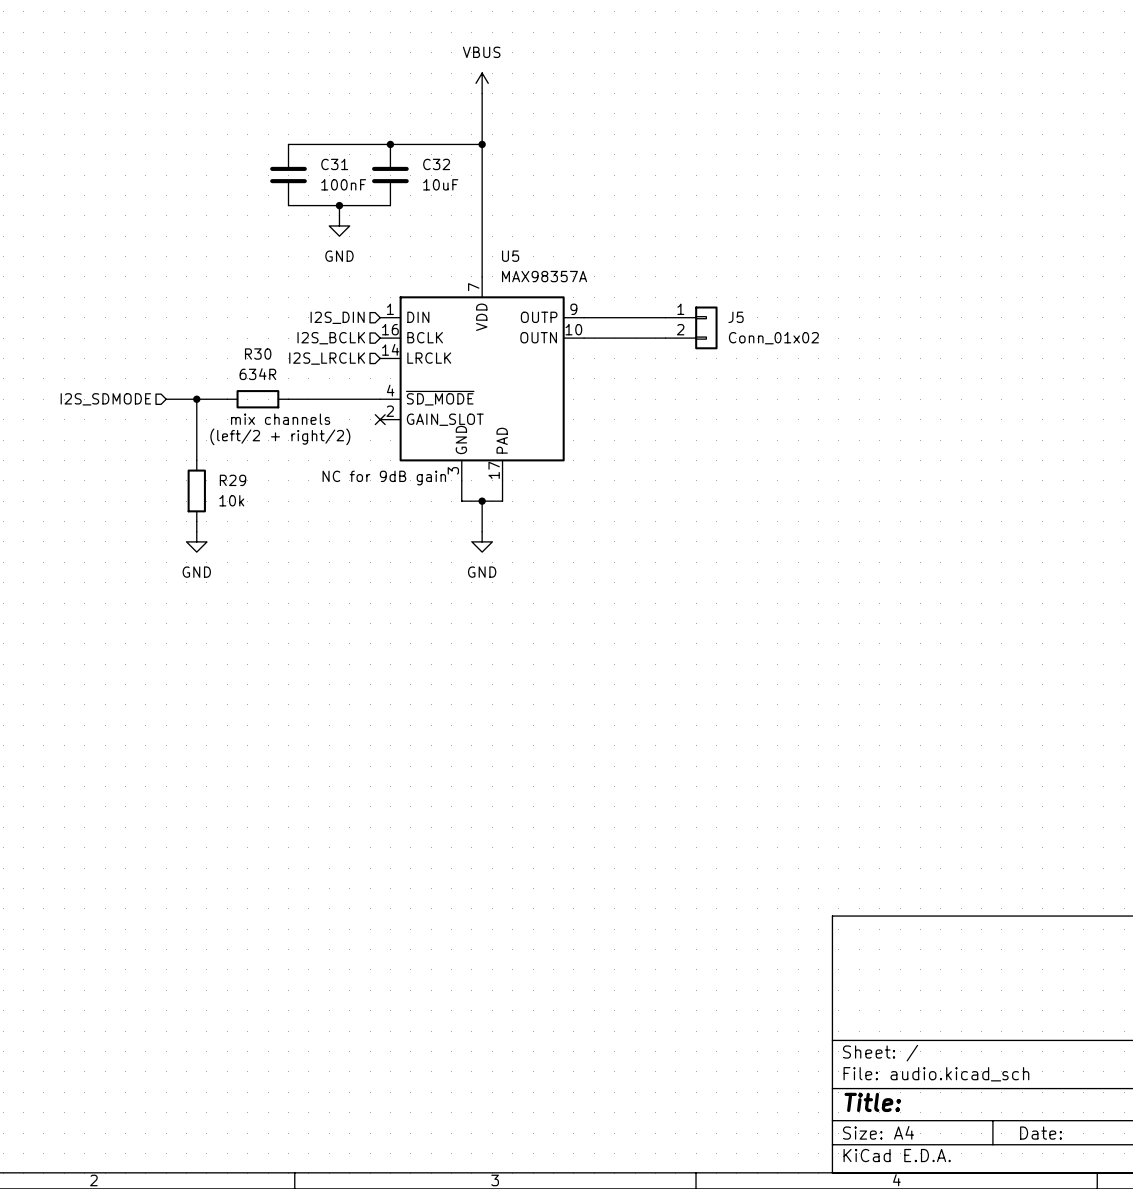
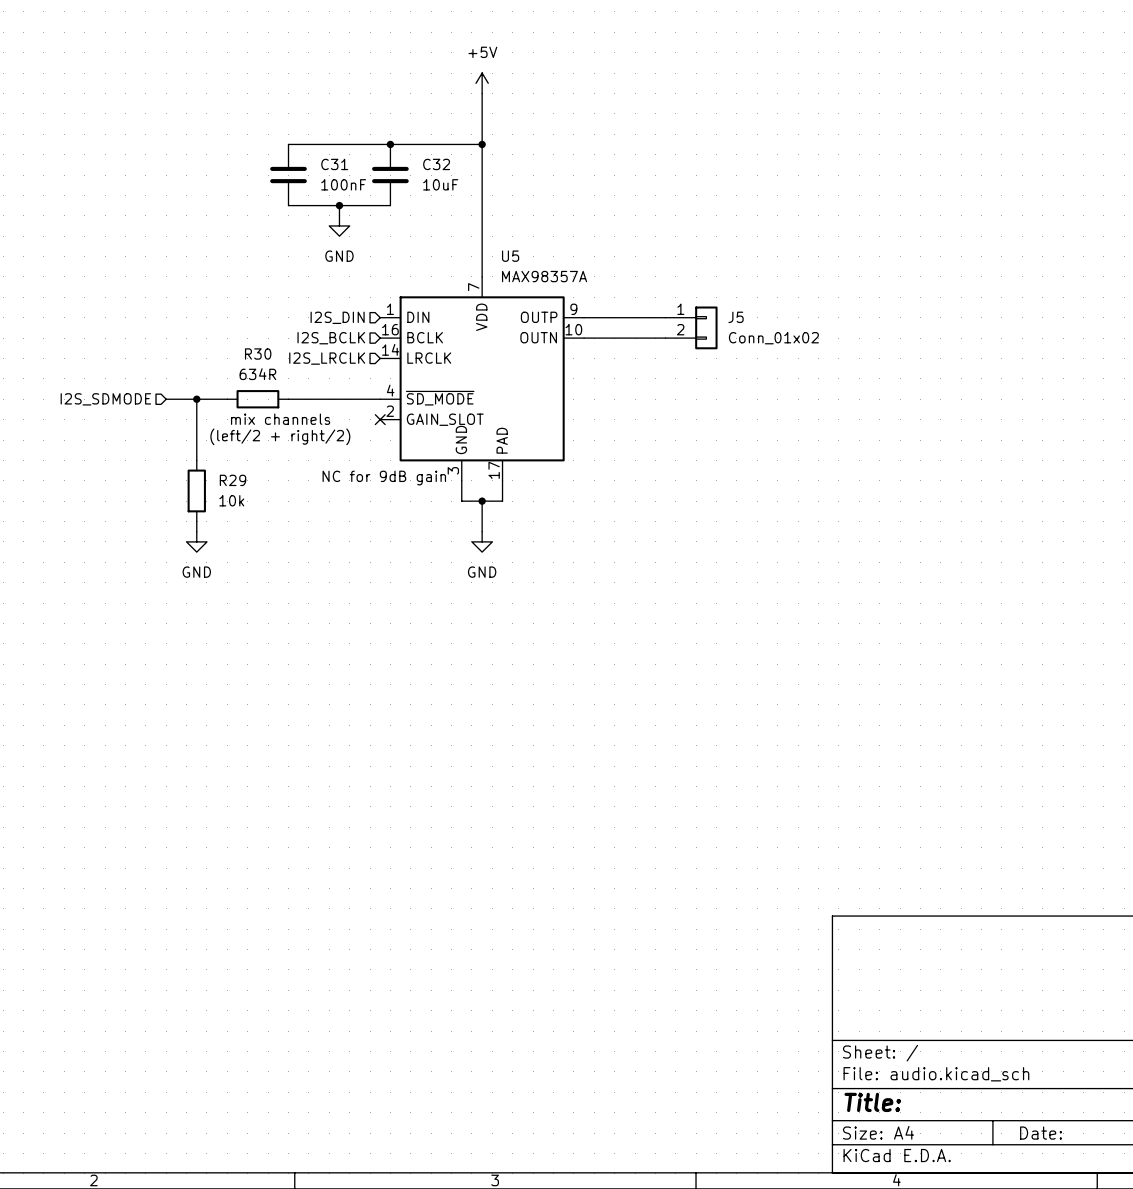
power symbol: VBUS (482, 83) -> +5V (482, 83)

